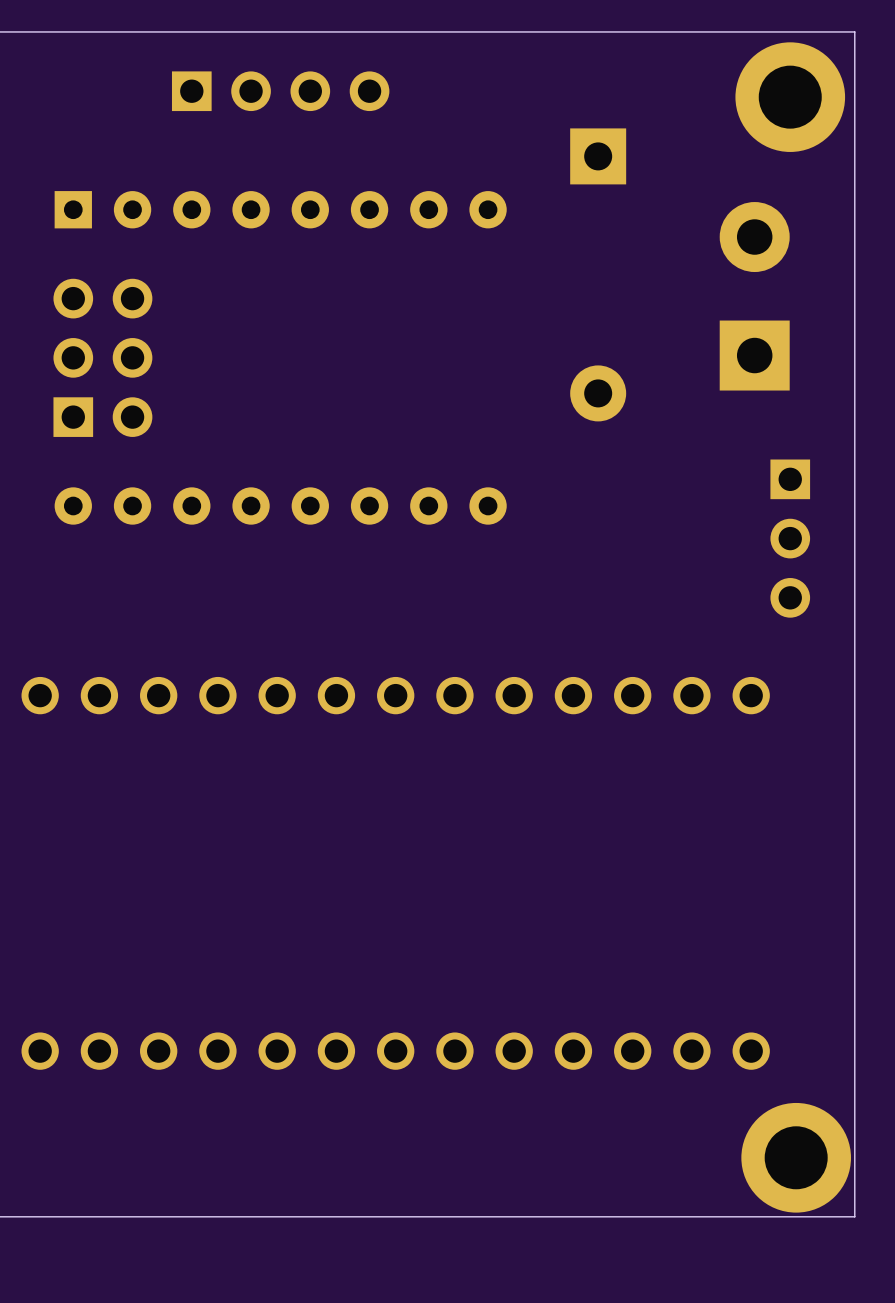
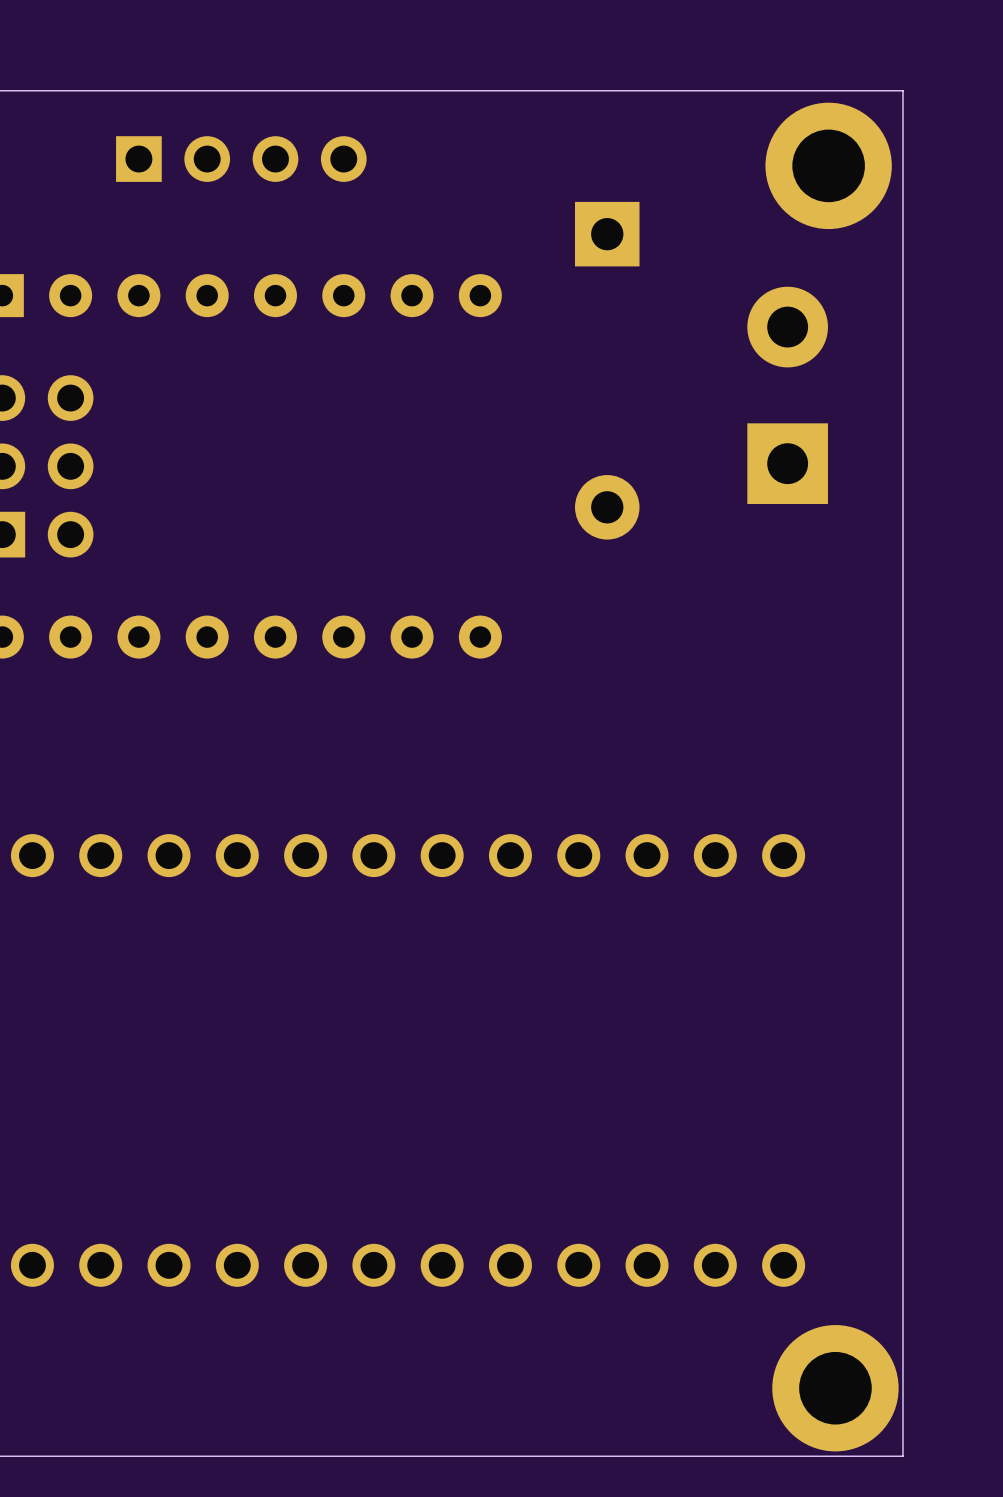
part: (790, 538) -> none

